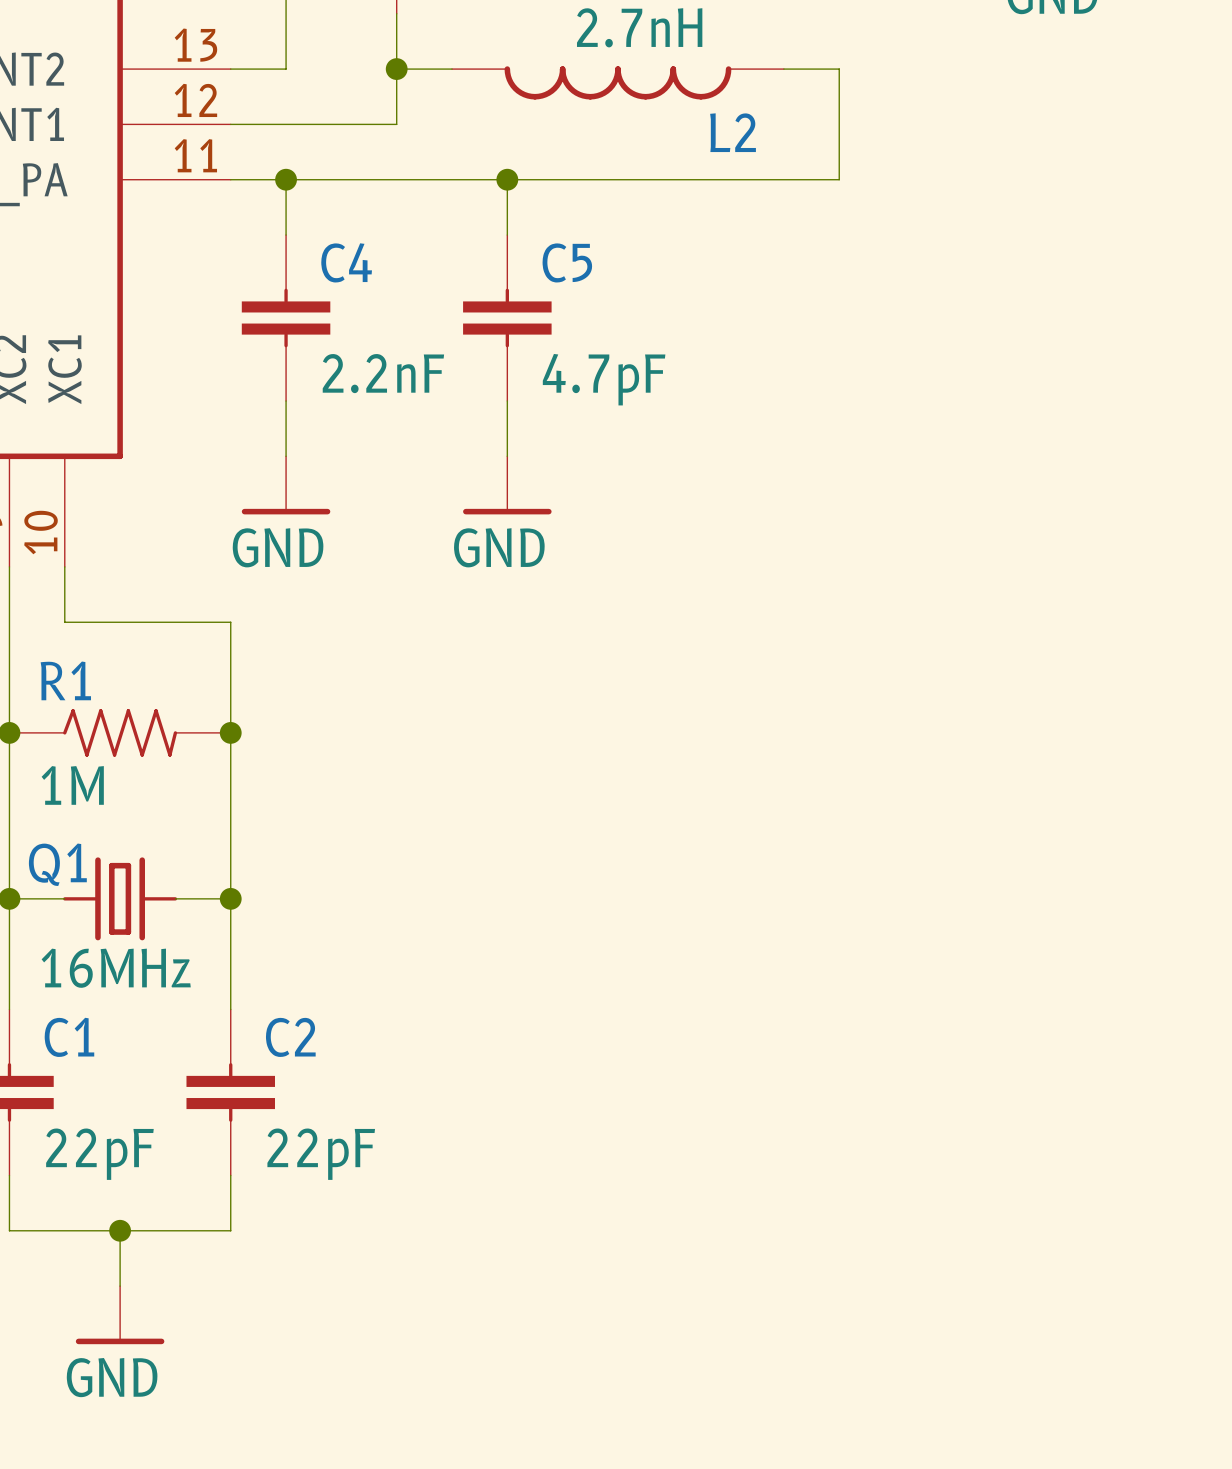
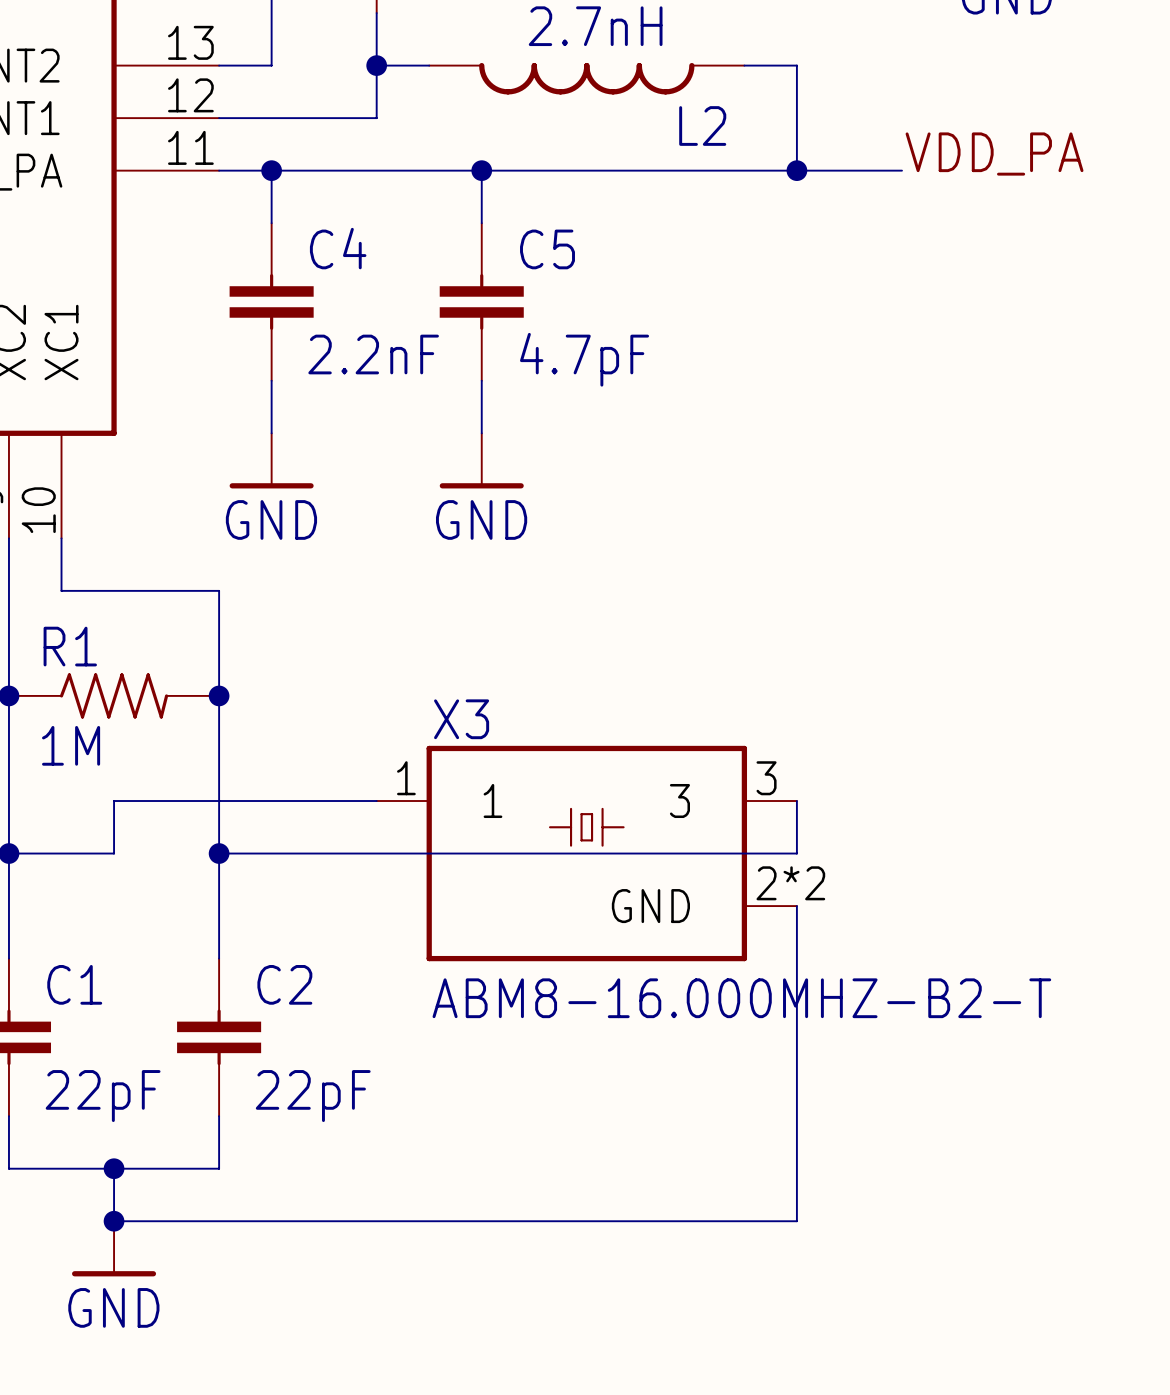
label: none -> VDD_PA (994, 154)
wire: none -> (796, 170) (901, 170)
junction: none -> (796, 170)
wire: none -> (376, 801) (114, 801) (114, 853) (61, 853)
Q1: 16MHz (120, 898) -> none
wire: (175, 898) (230, 898) -> (796, 801) (796, 853) (219, 853)
X3: none -> ABM8-16.000MHZ-B2-T (586, 853)
wire: none -> (796, 906) (796, 1221) (114, 1221)
junction: none -> (114, 1221)

